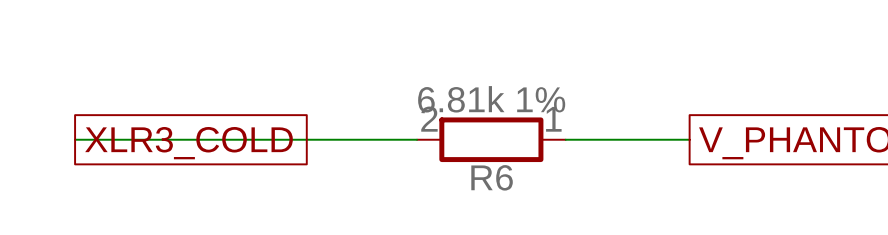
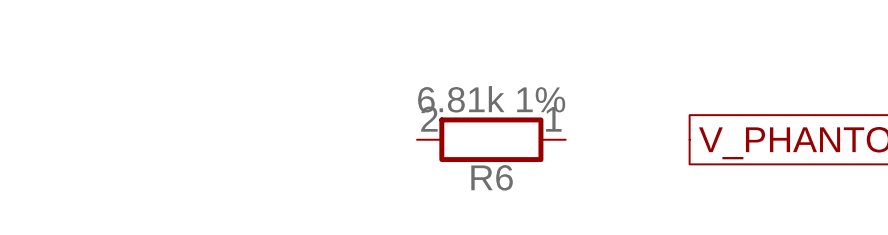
wire: (75, 139) (417, 139) -> none
wire: (565, 139) (689, 139) -> none
global label: XLR3_COLD (189, 143) -> none

